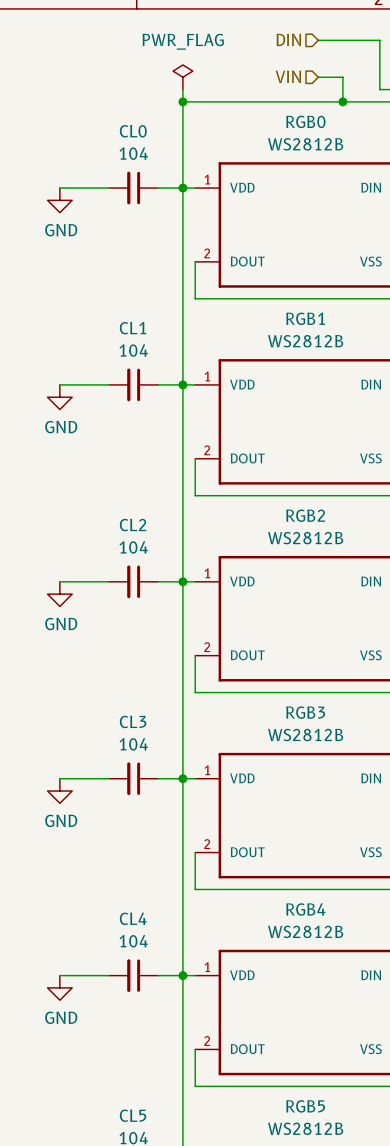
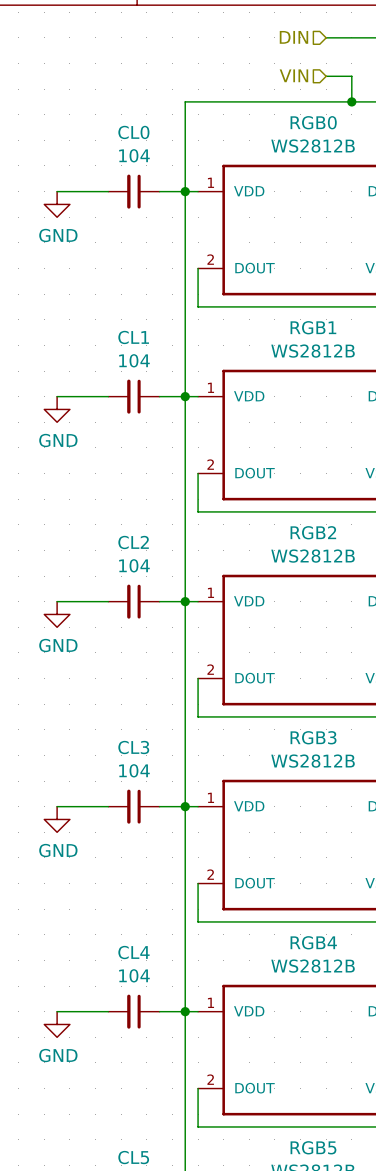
power symbol: PWR_FLAG (182, 77) -> none
wire: (182, 89) (182, 101) -> none
junction: (182, 101) -> none

